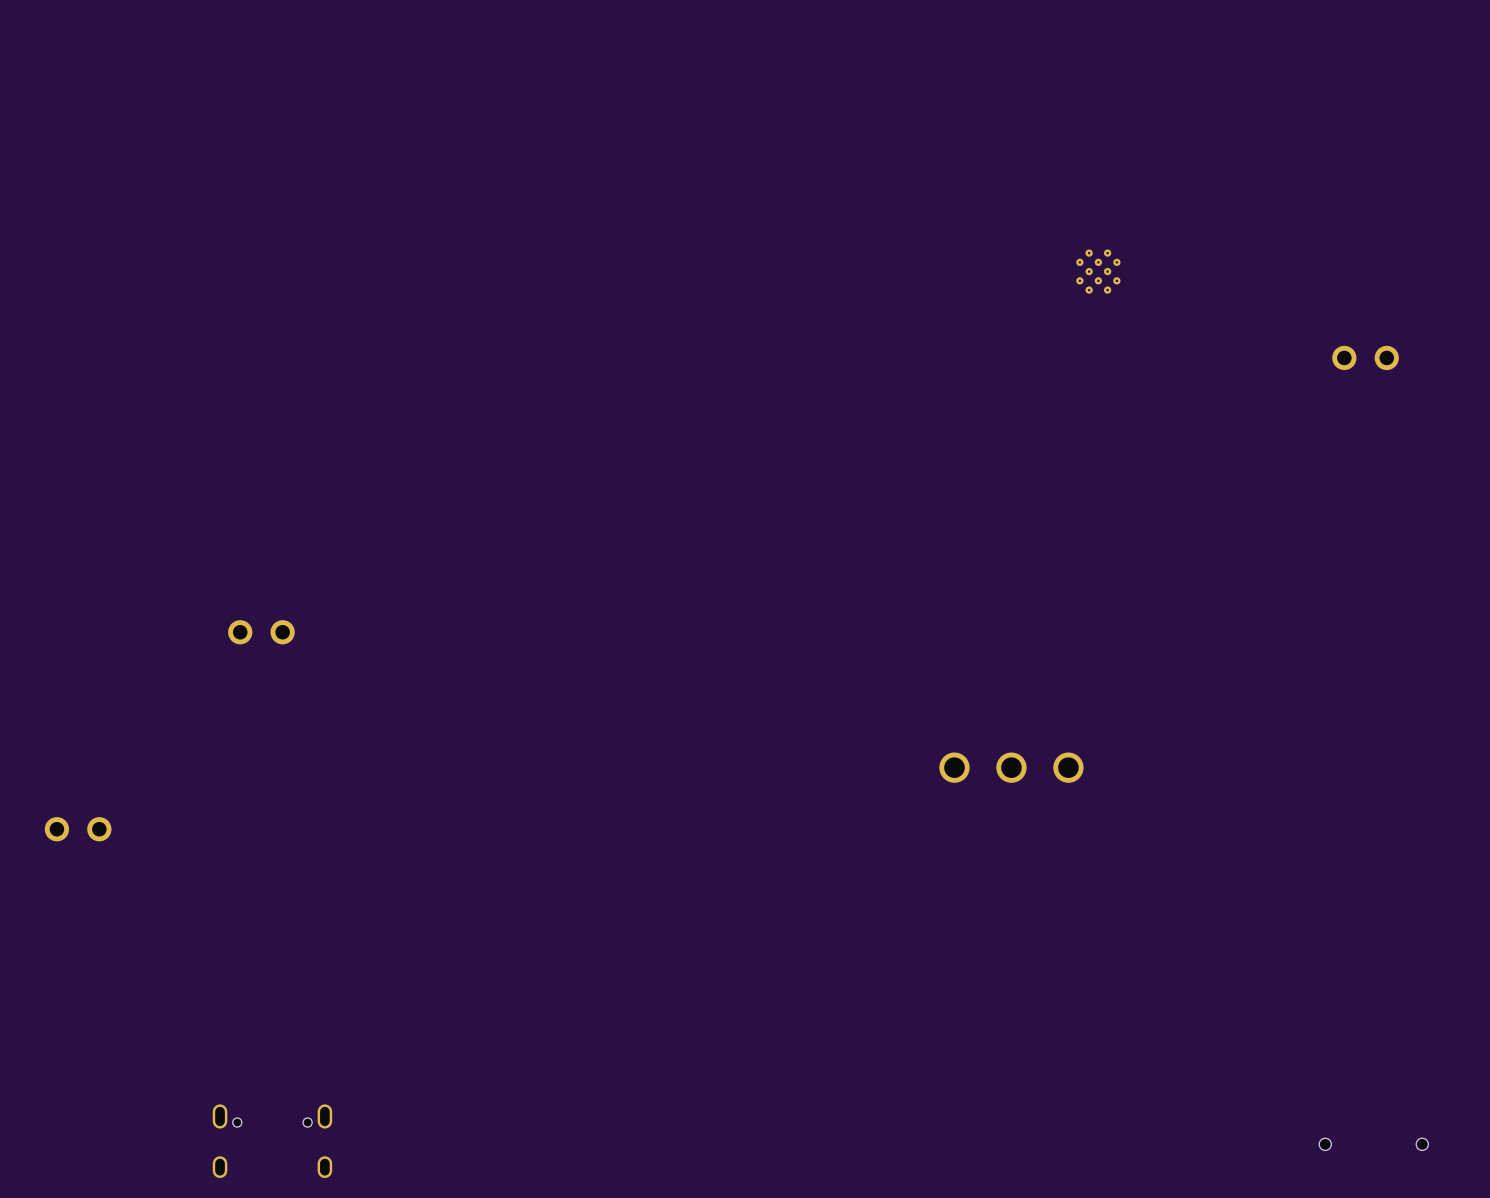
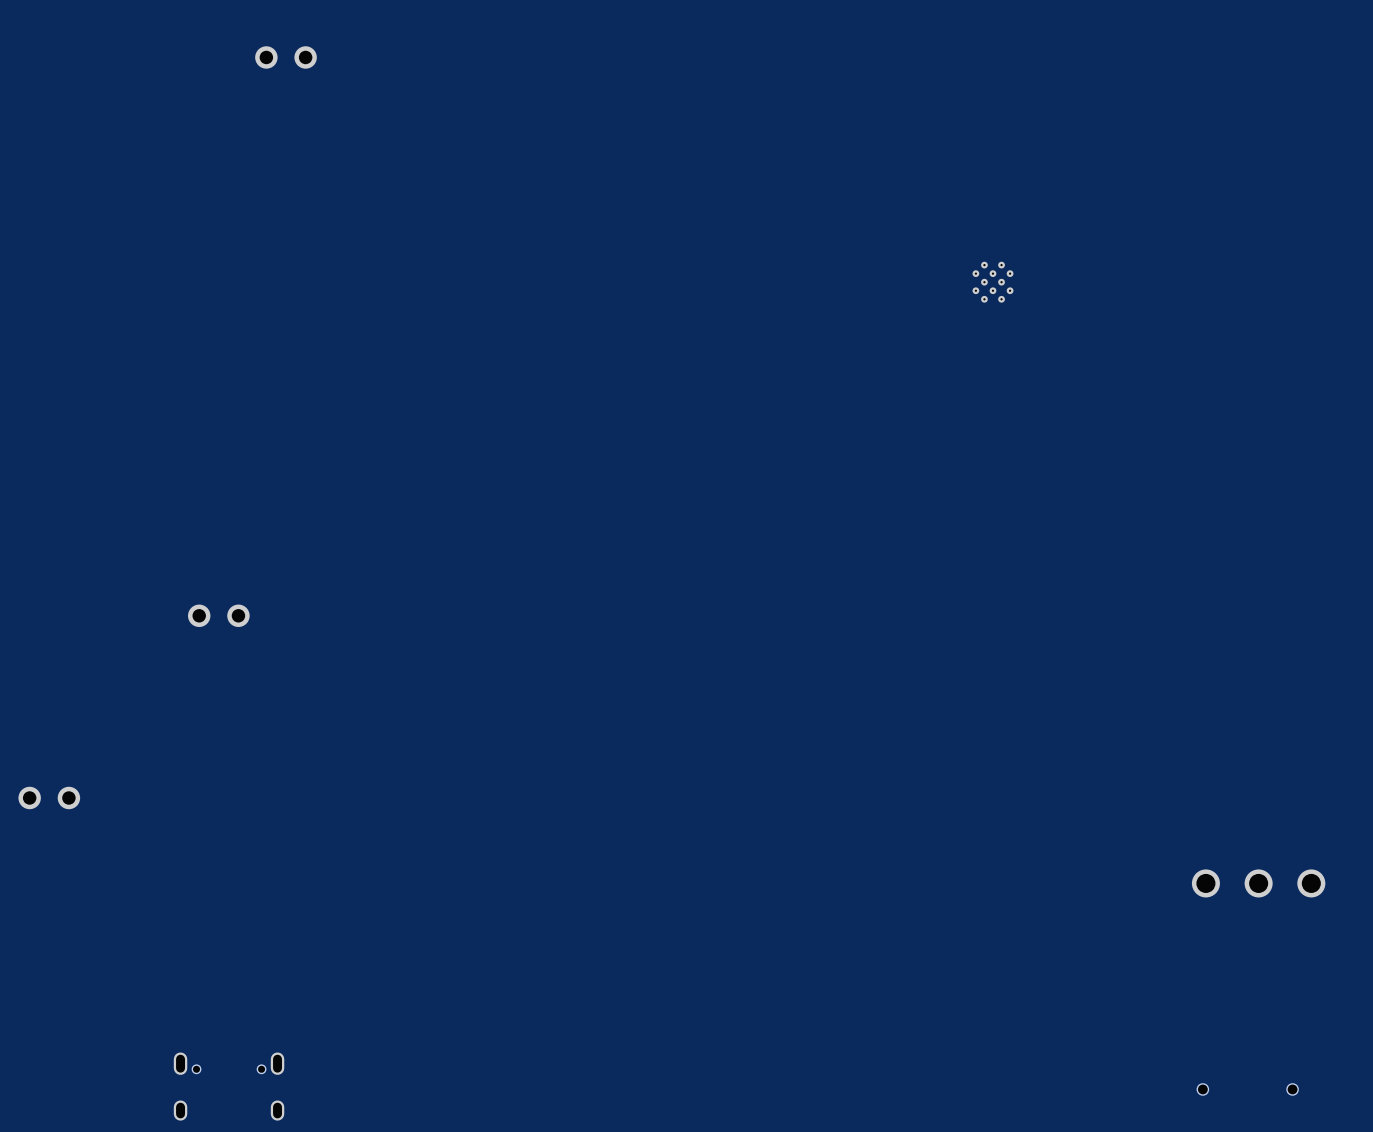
part: none -> (286, 57)
part: (1365, 357) -> none
part: (1011, 767) -> none
part: none -> (1258, 883)

